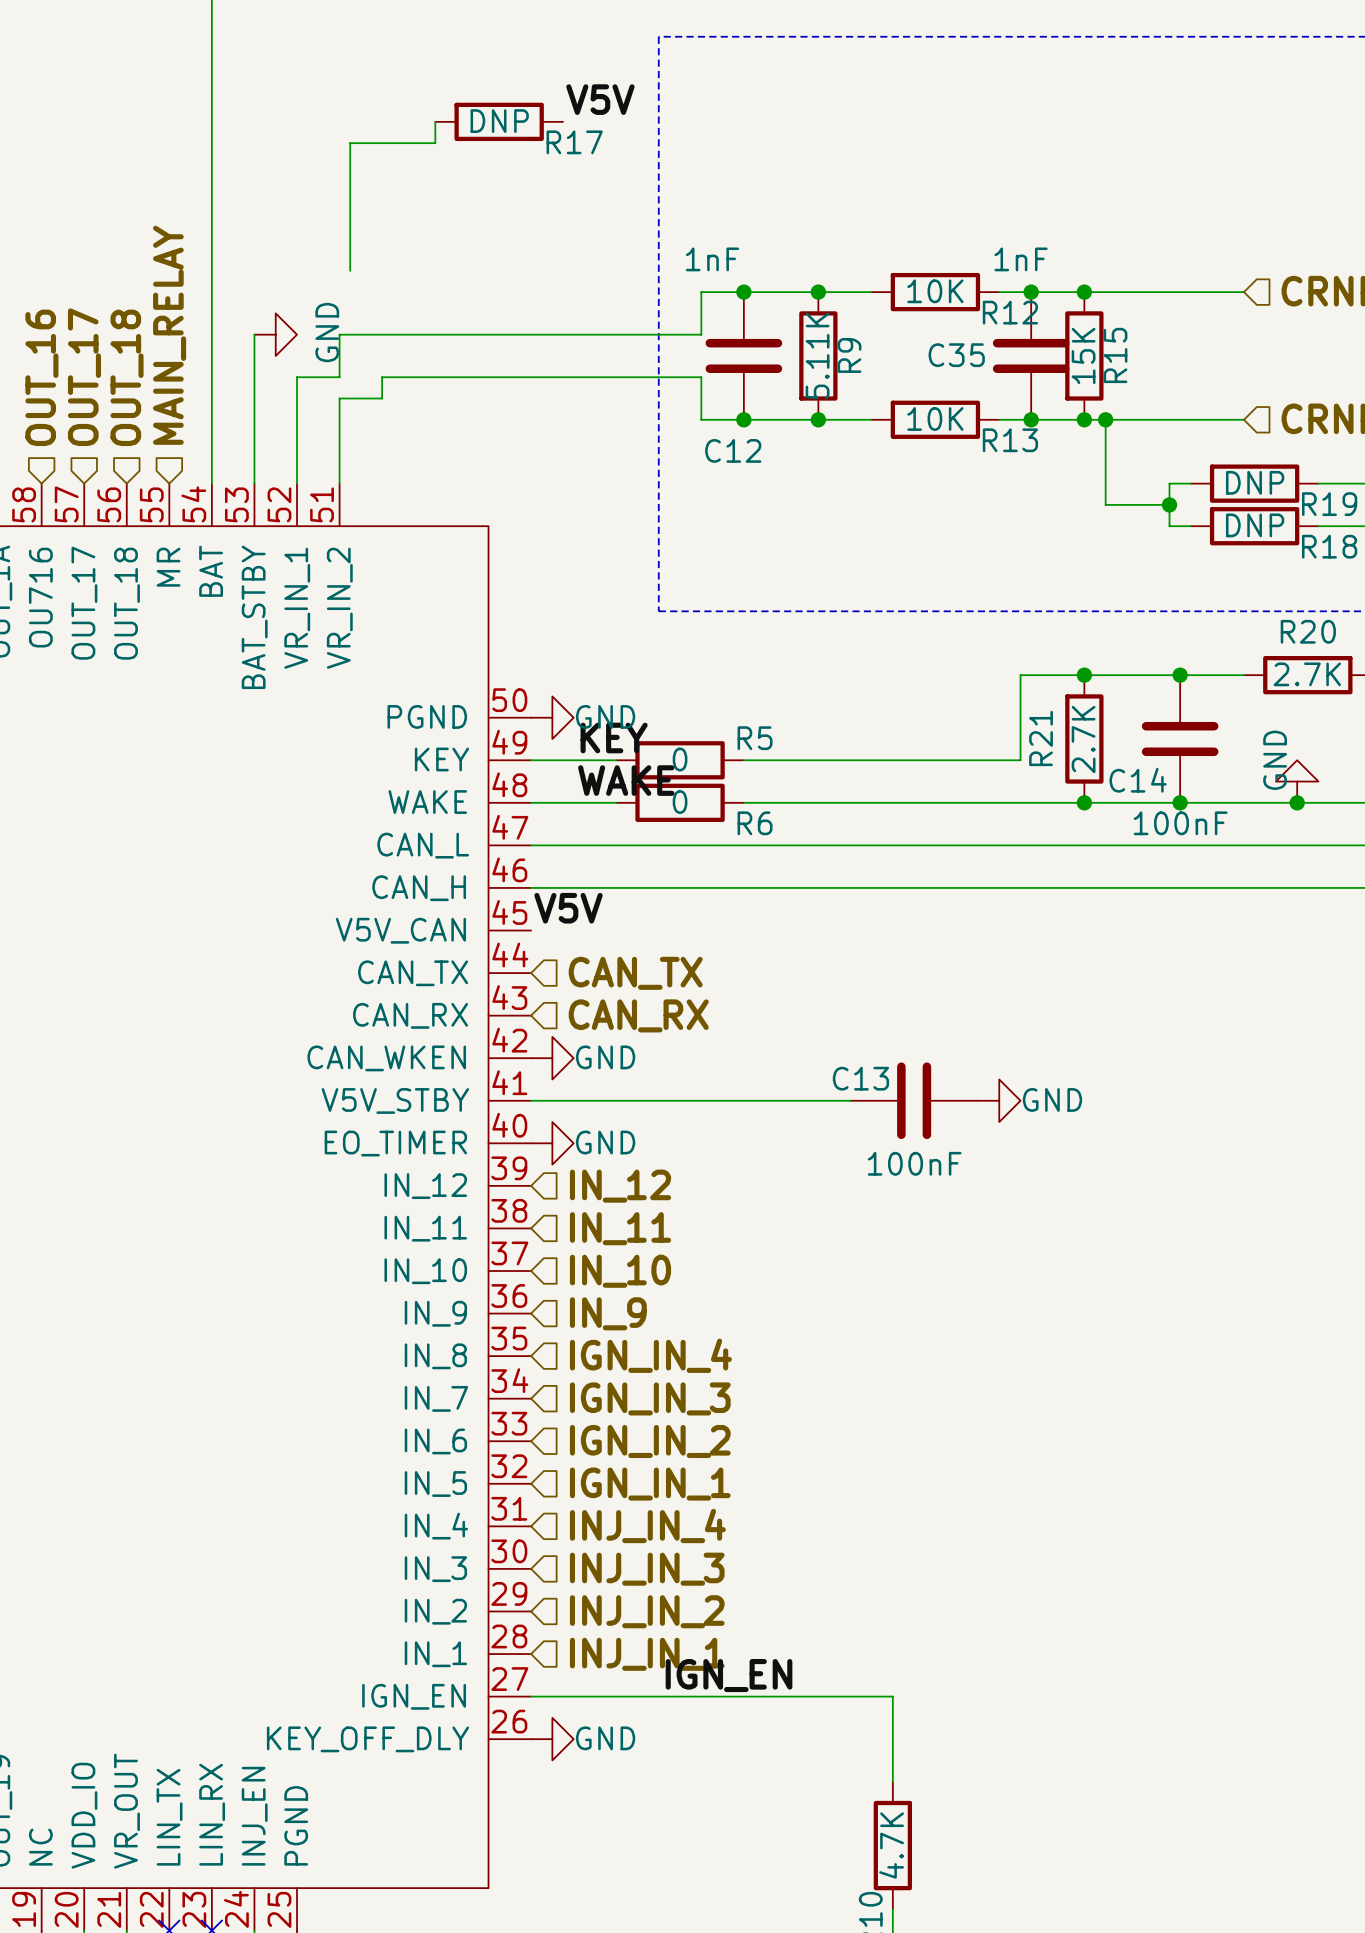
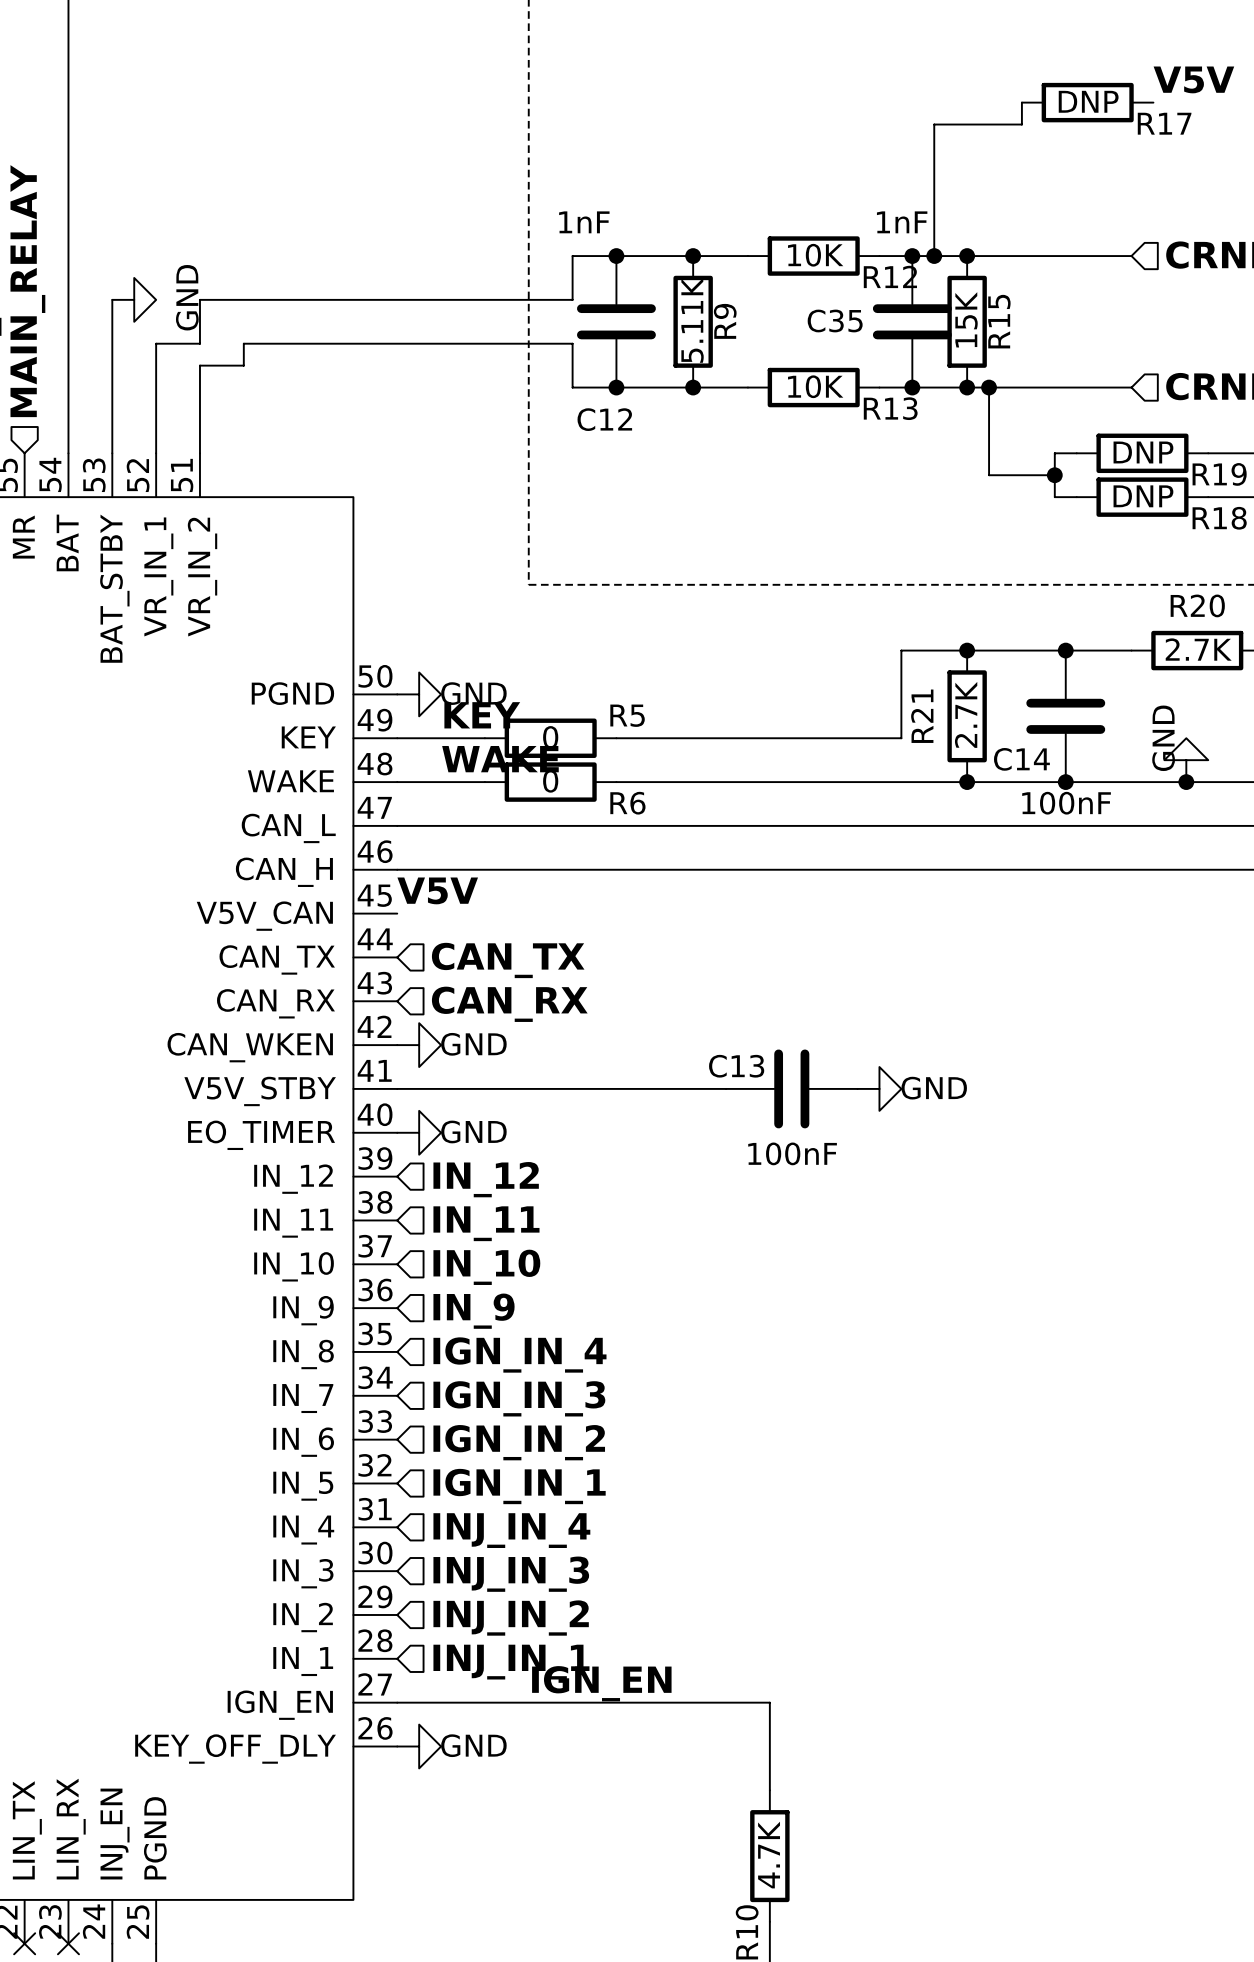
label: V5V (600, 99) -> none
label: none -> V5V (1193, 79)
wire: (435, 121) (435, 143) (350, 143) (350, 270) -> none
R17 position: (499, 121) -> (1087, 102)
wire: none -> (1021, 102) (1021, 124) (934, 124) (934, 256)
junction: none -> (934, 256)

